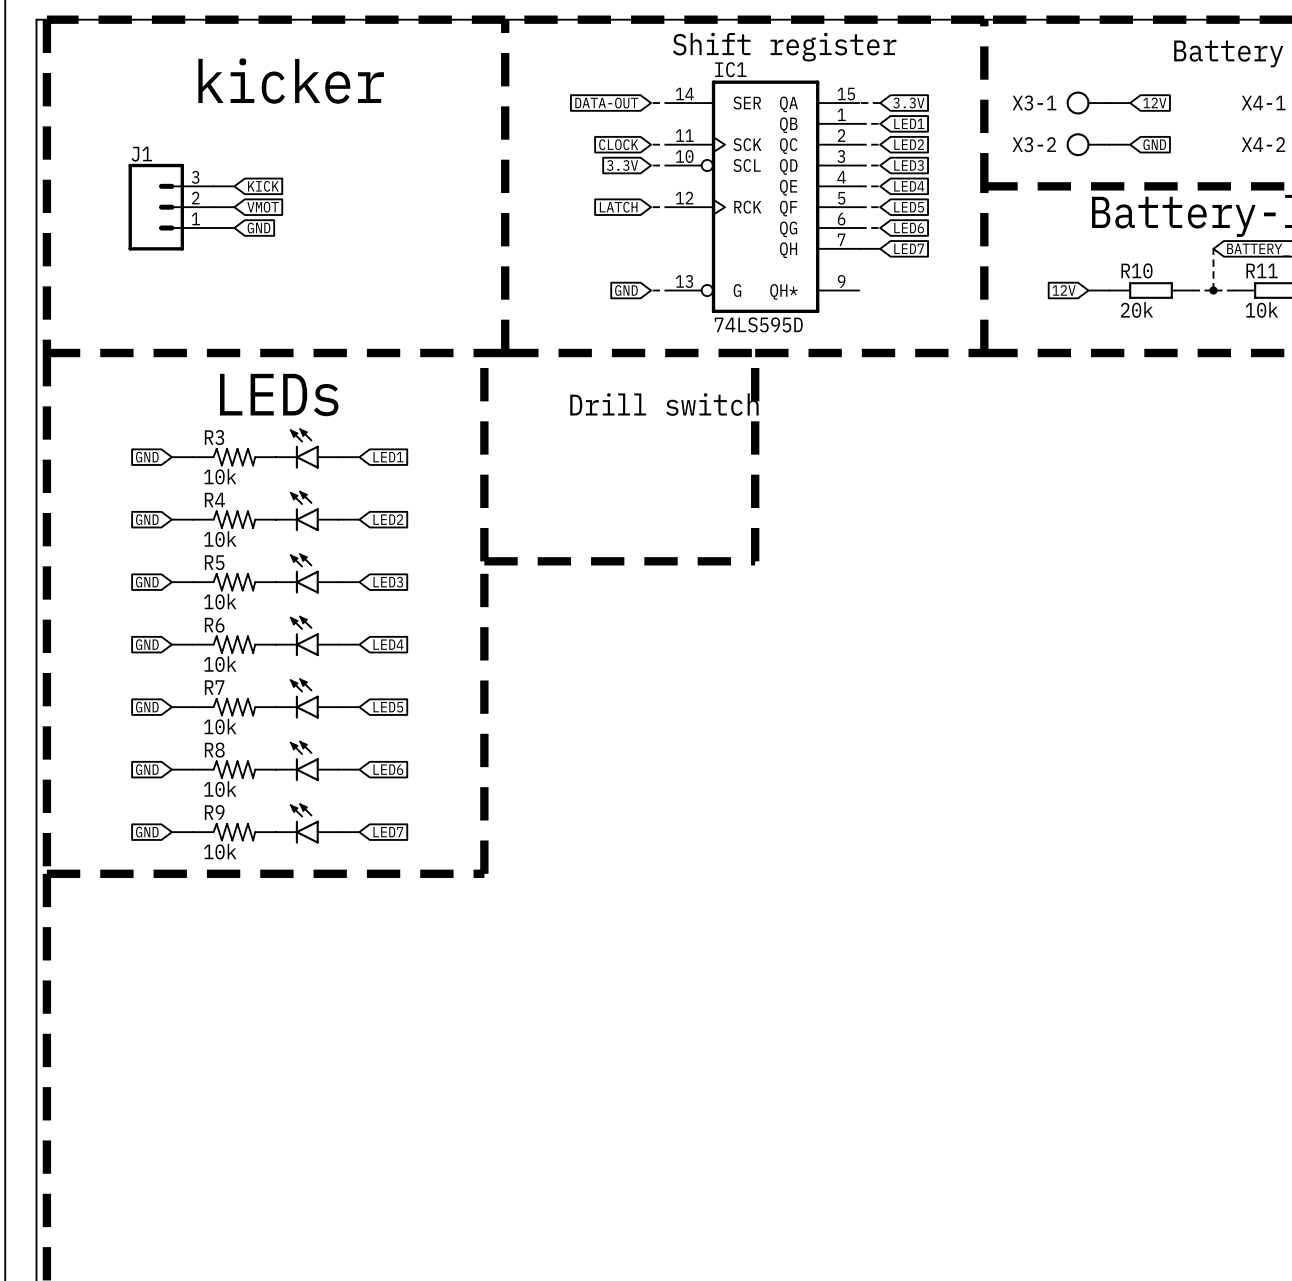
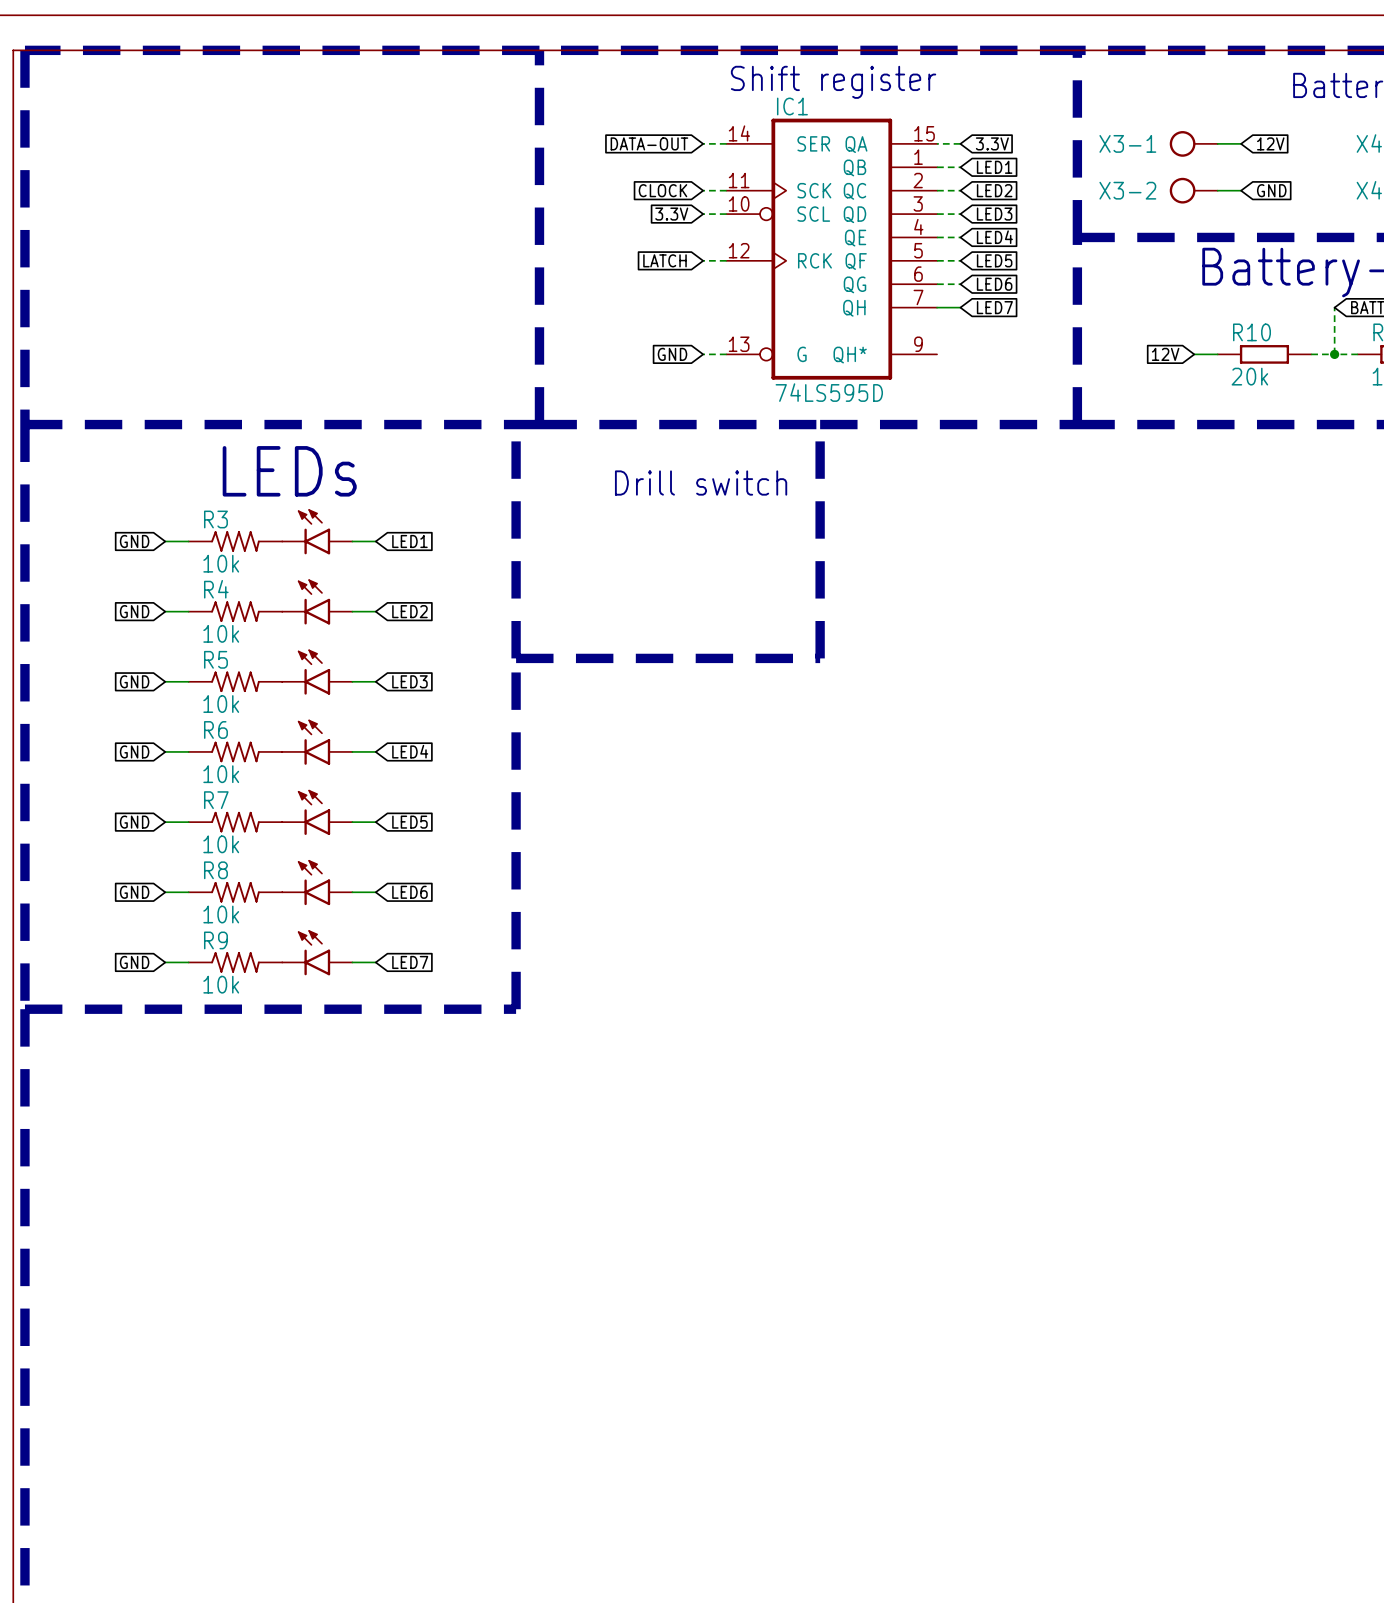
text: kicker (291, 81) -> none
wire: (213, 186) (234, 186) -> none
global label: KICK (263, 186) -> none
J1: (171, 207) -> none
wire: (213, 207) (234, 207) -> none
global label: VMOT (263, 207) -> none
wire: (213, 228) (234, 228) -> none
global label: GND (258, 228) -> none

